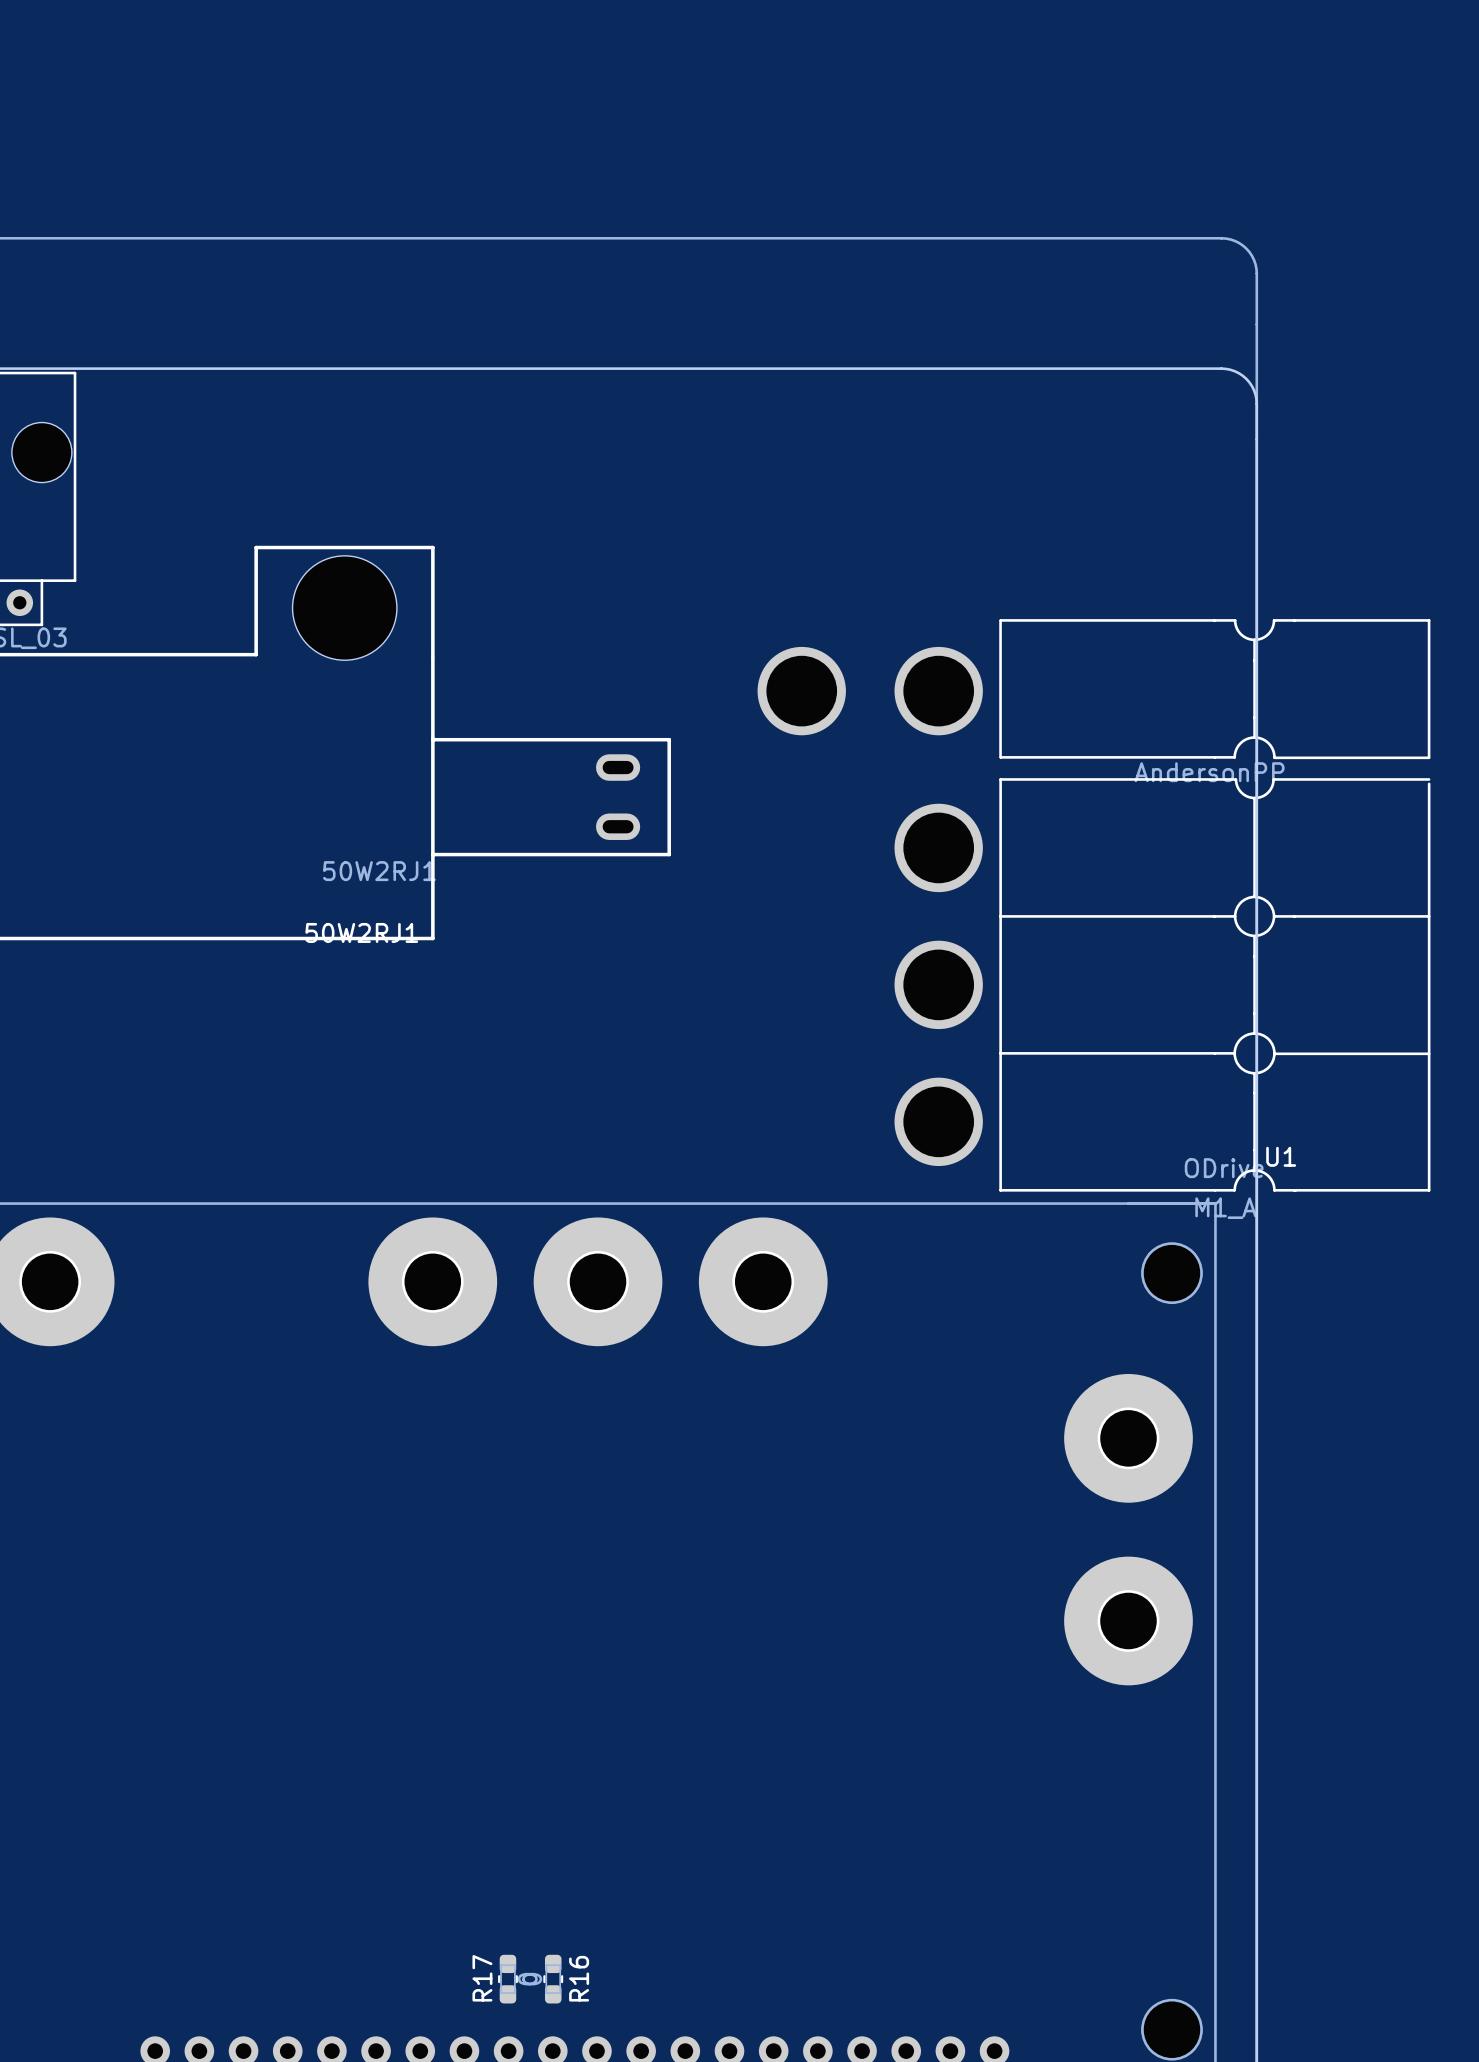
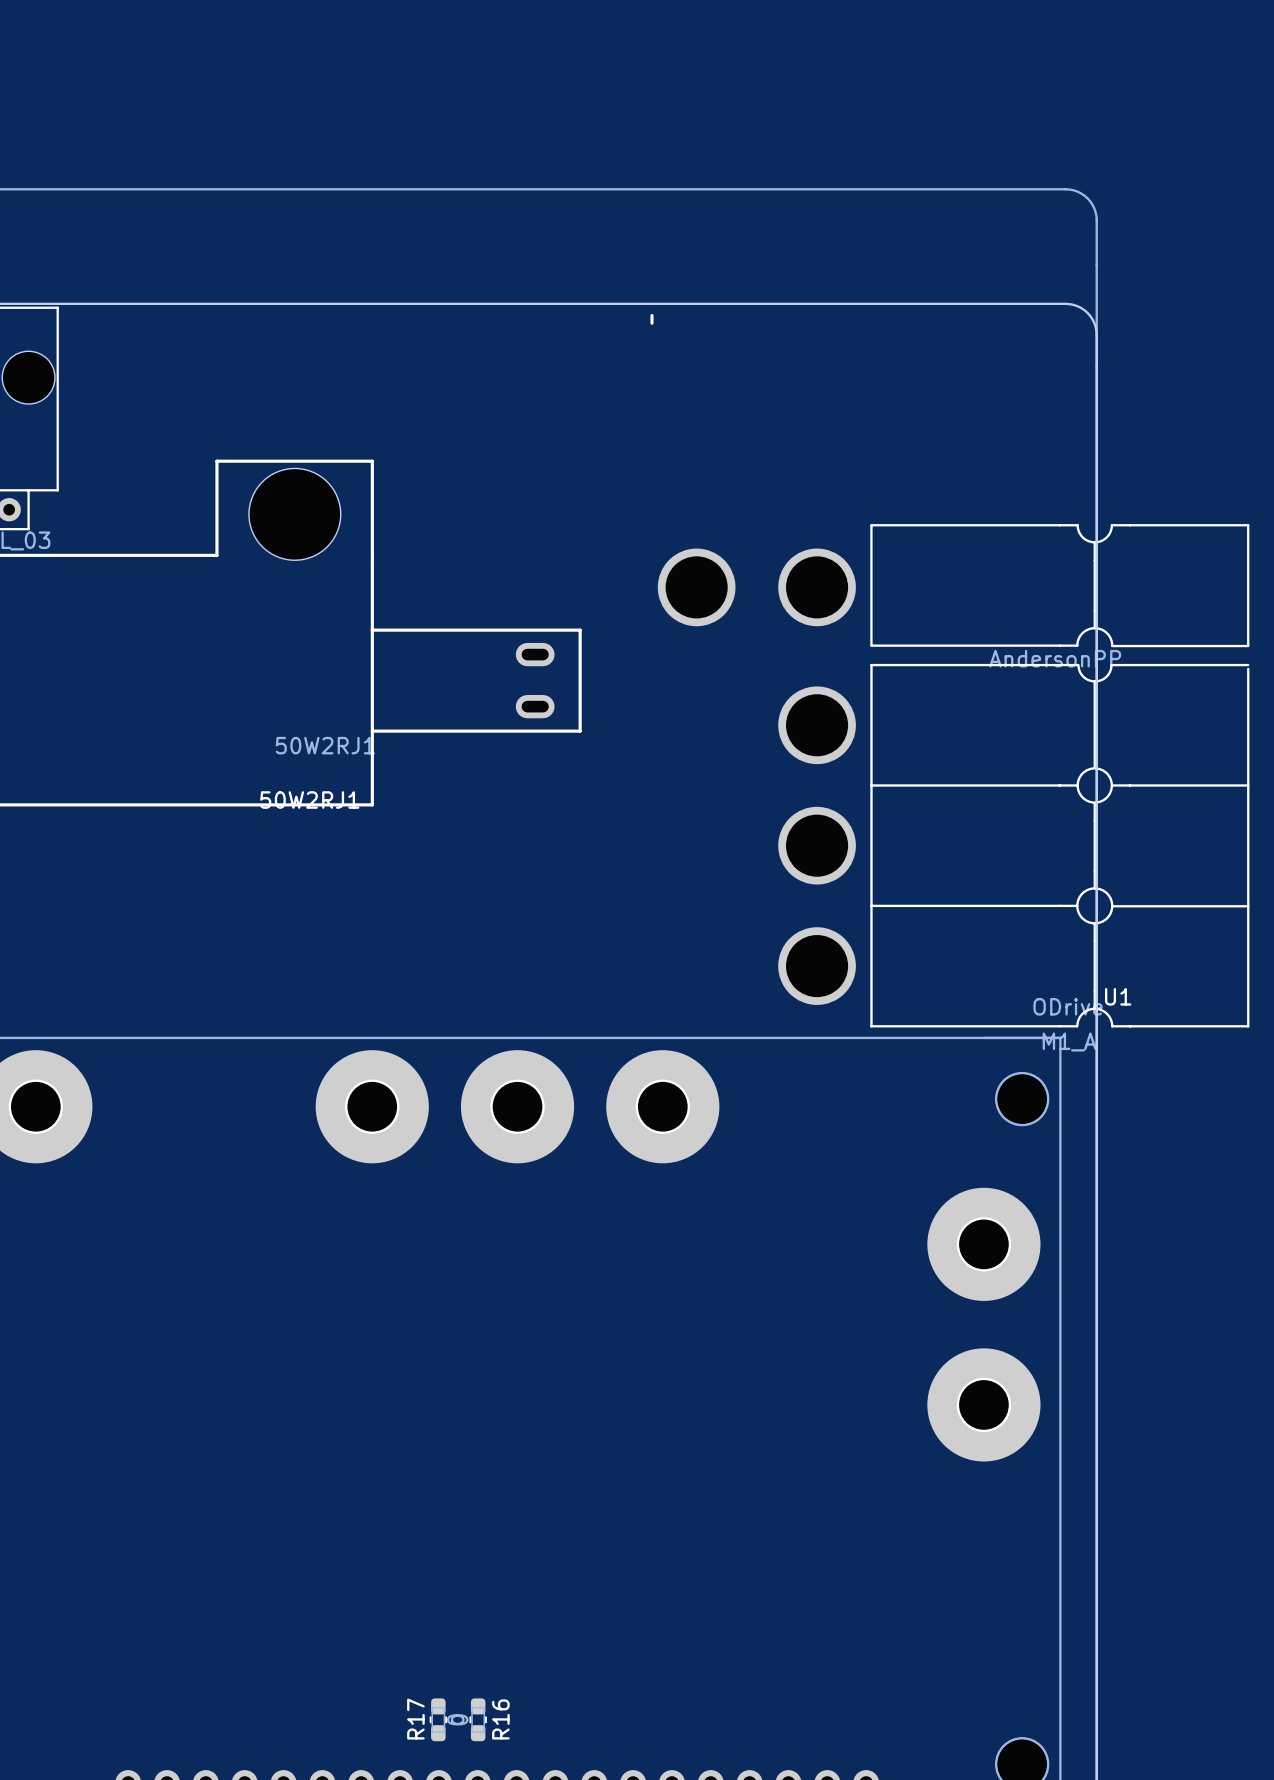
line: none -> (651, 315) (651, 323)

